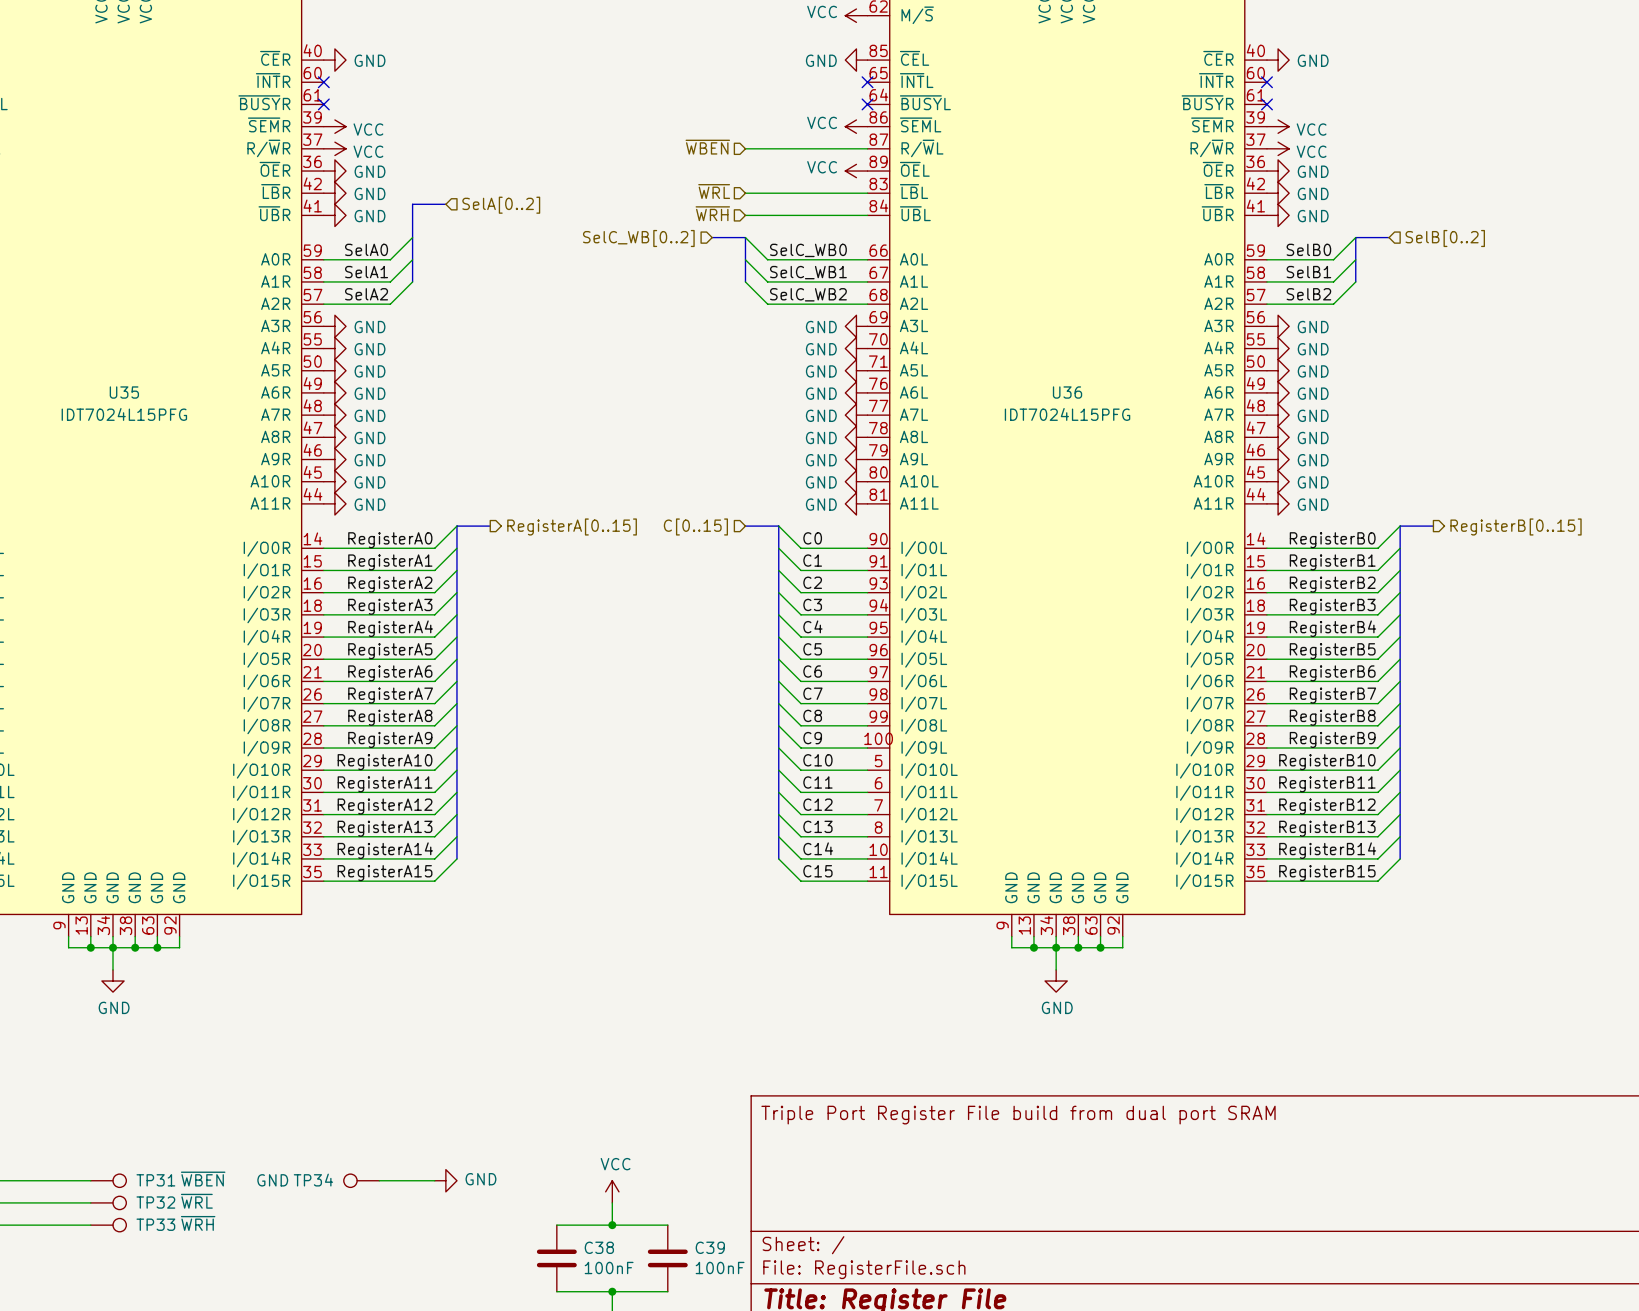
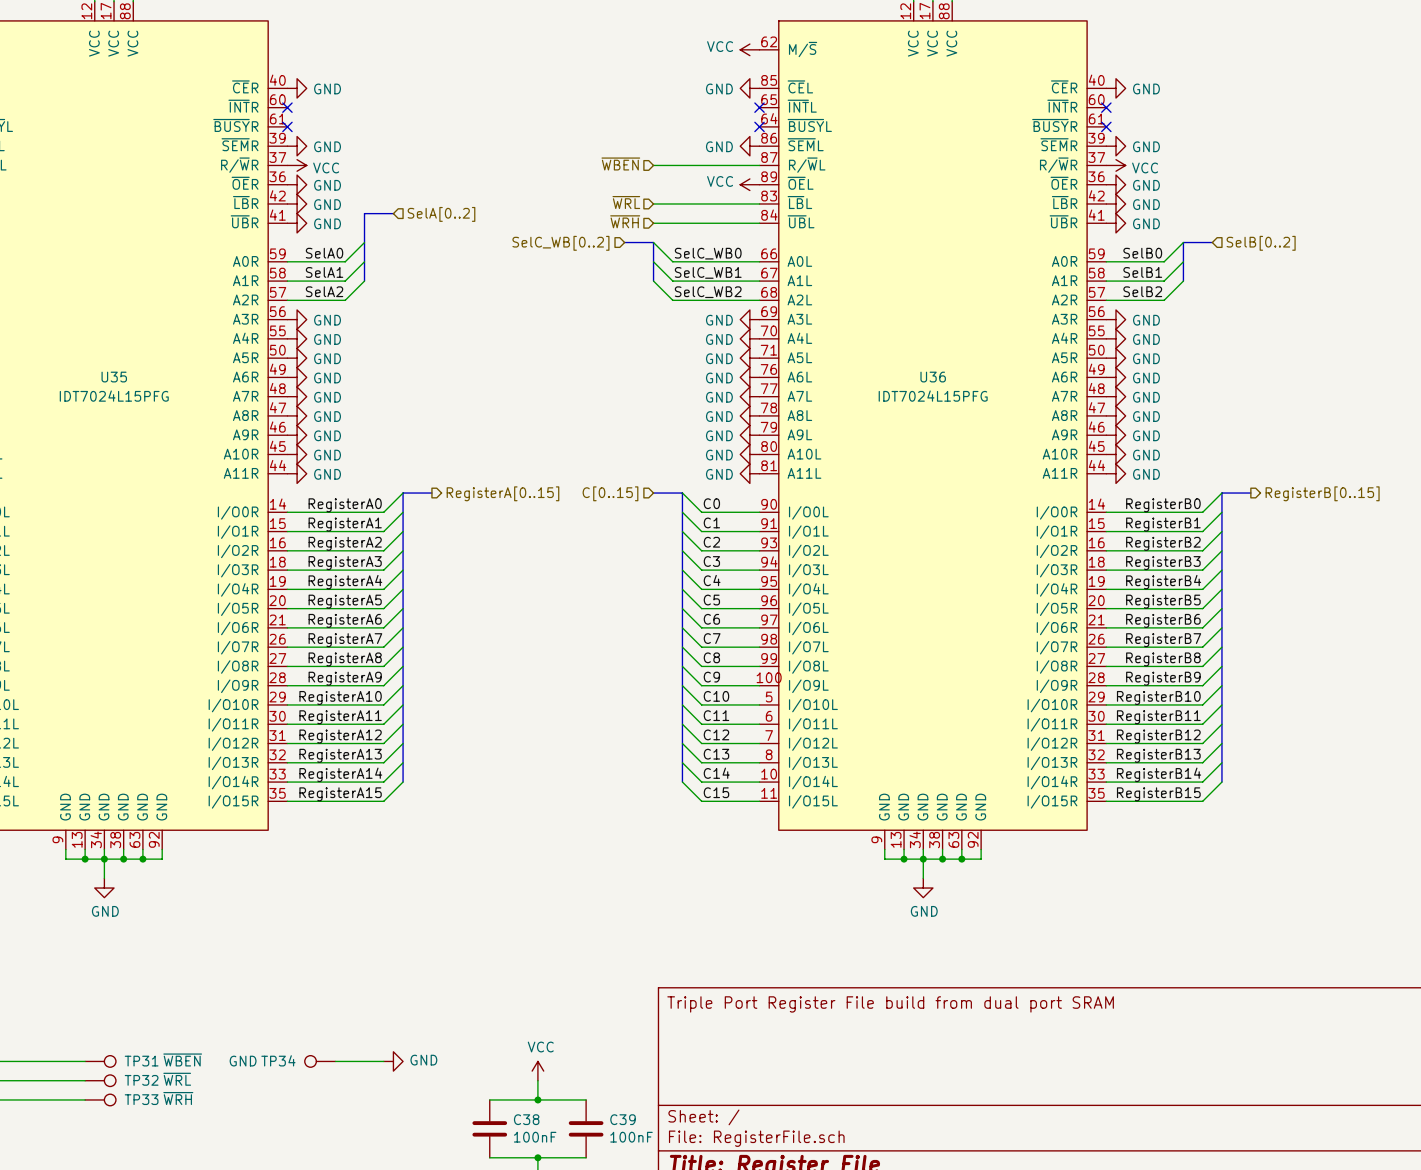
power symbol: VCC (334, 126) -> GND (297, 146)
power symbol: VCC (856, 126) -> GND (749, 146)
power symbol: VCC (1278, 126) -> GND (1115, 146)

